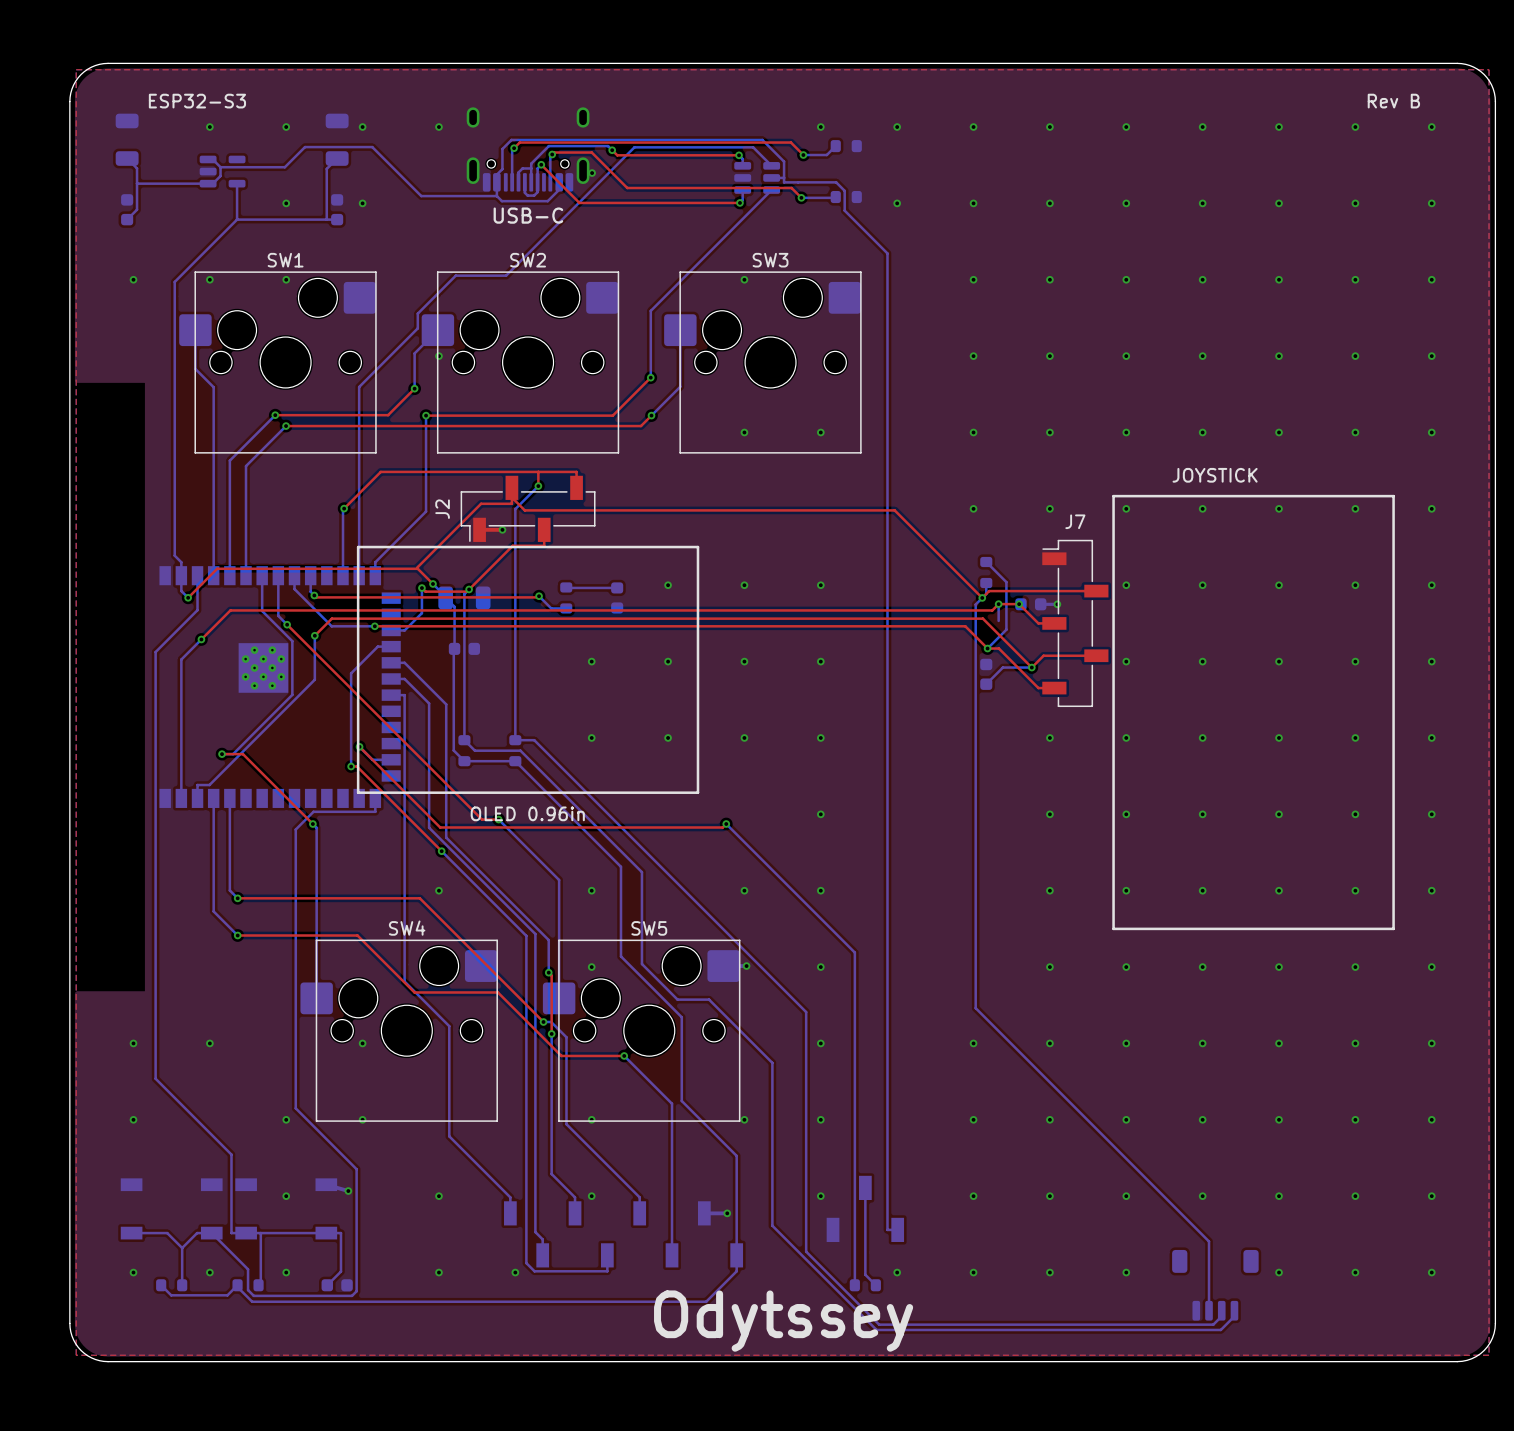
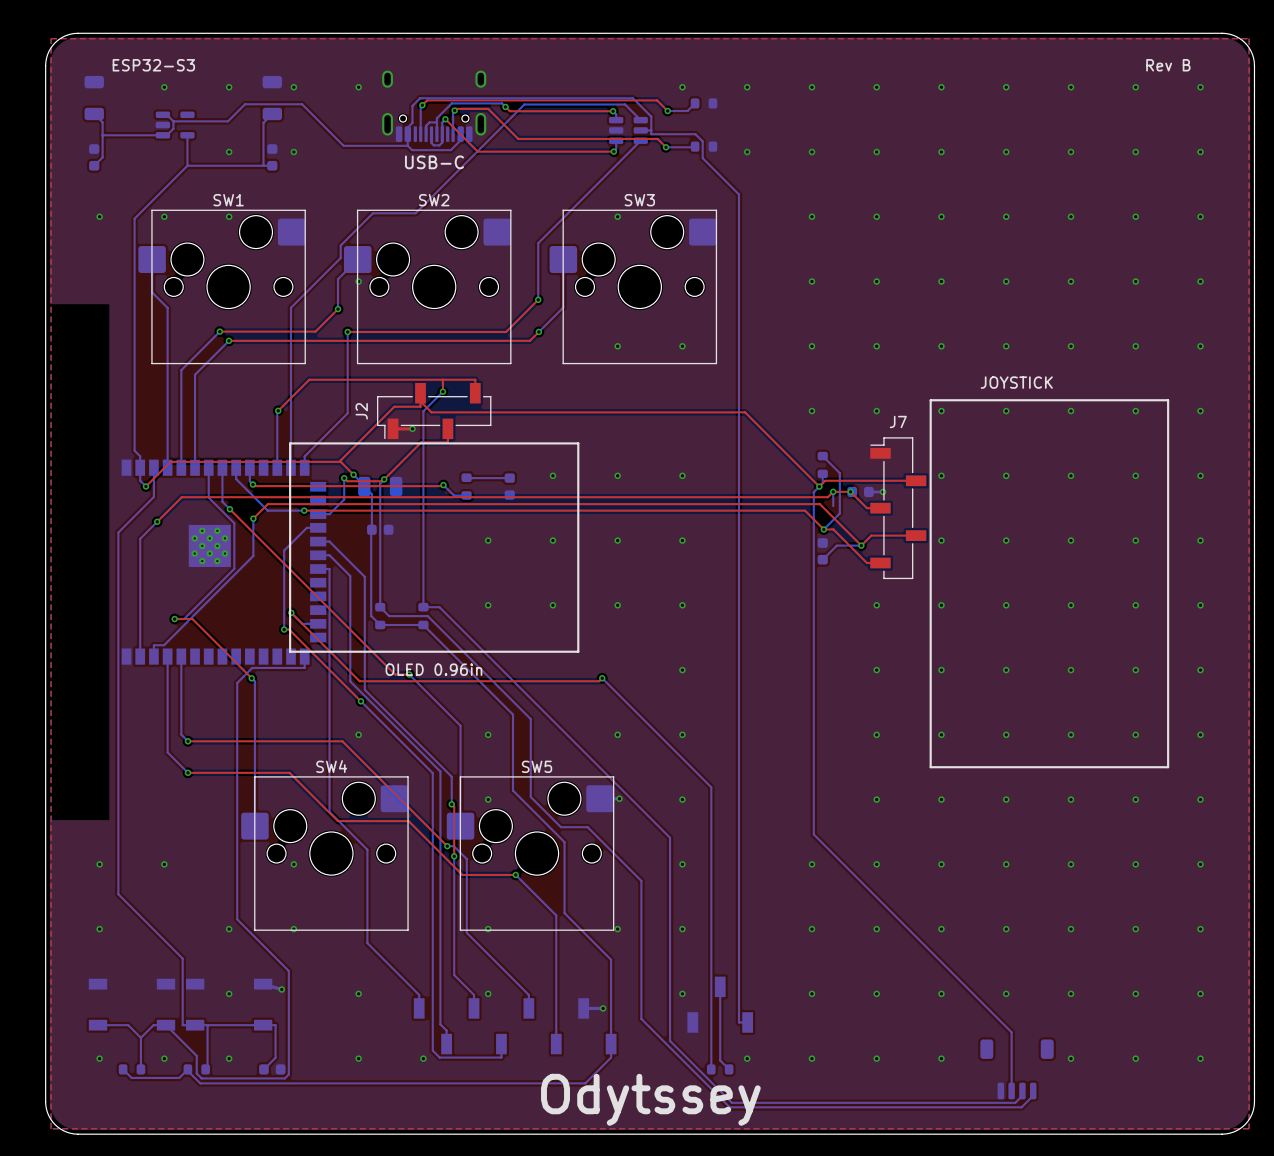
via: (592, 173) -> none

